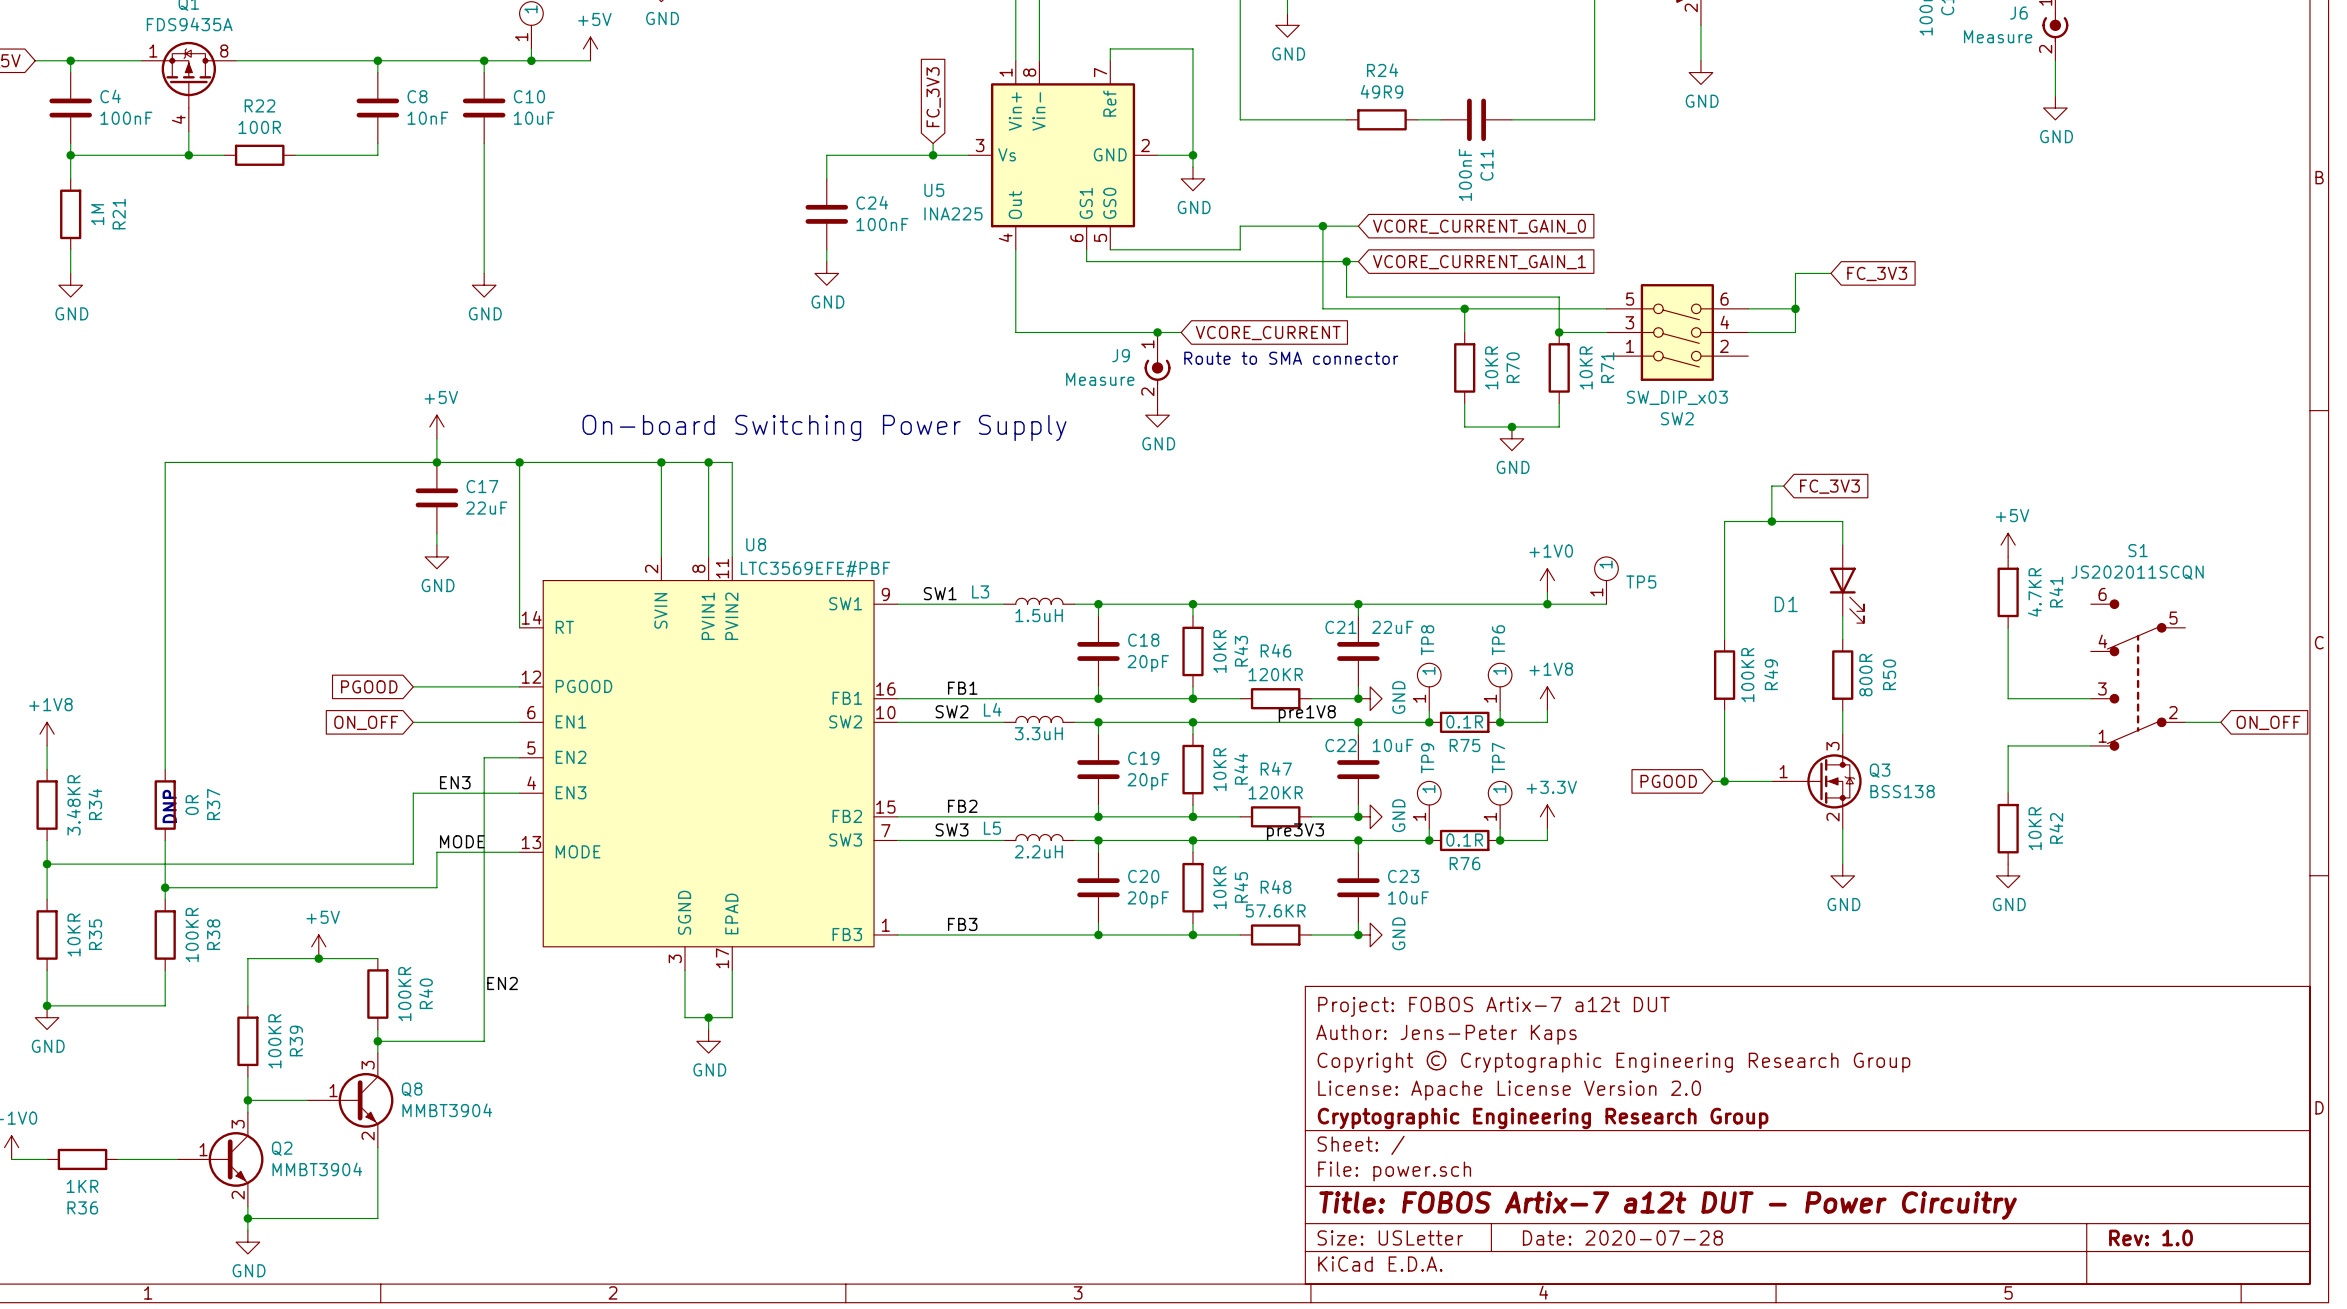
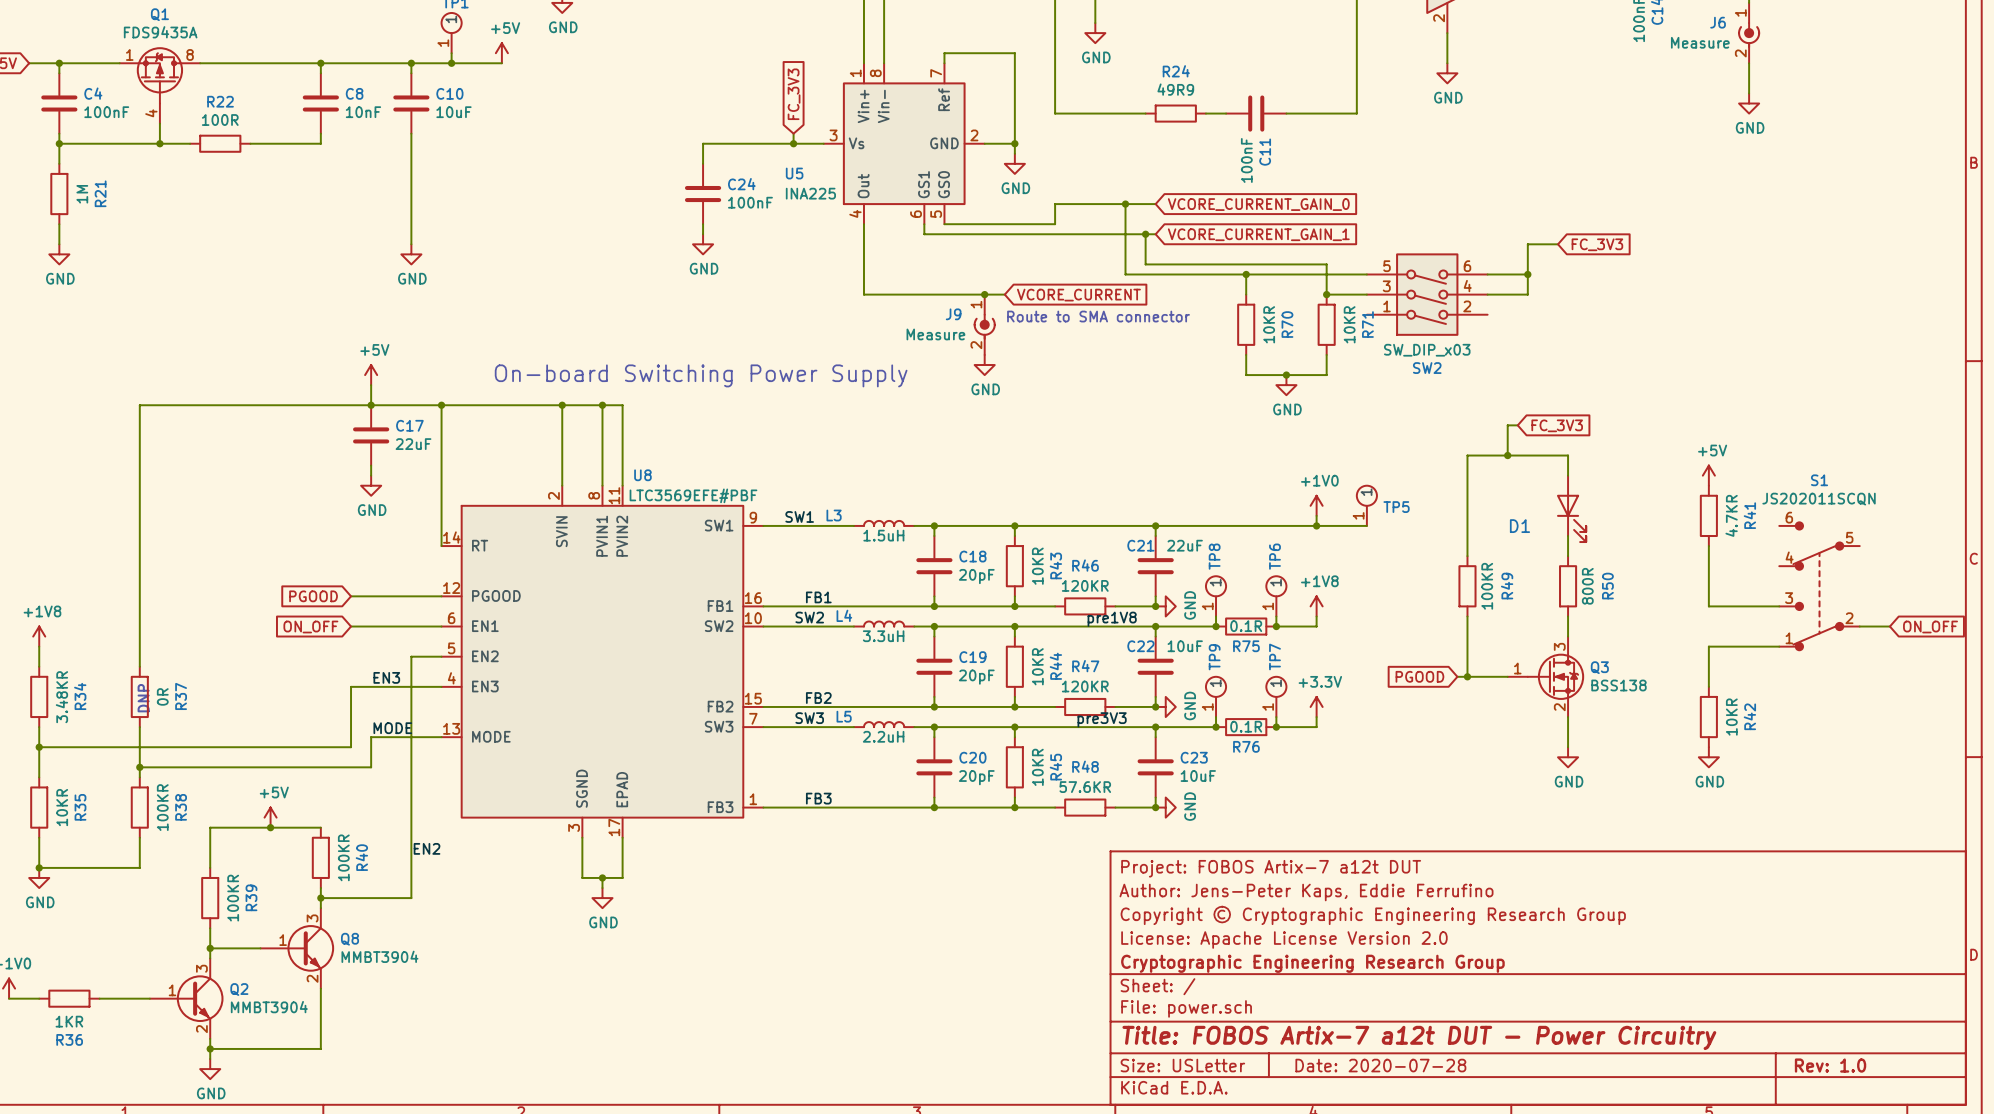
title block: Author: Jens-Peter Kaps (1446, 1034) -> Author: Jens-Peter Kaps, Eddie Ferrufino (1306, 892)

